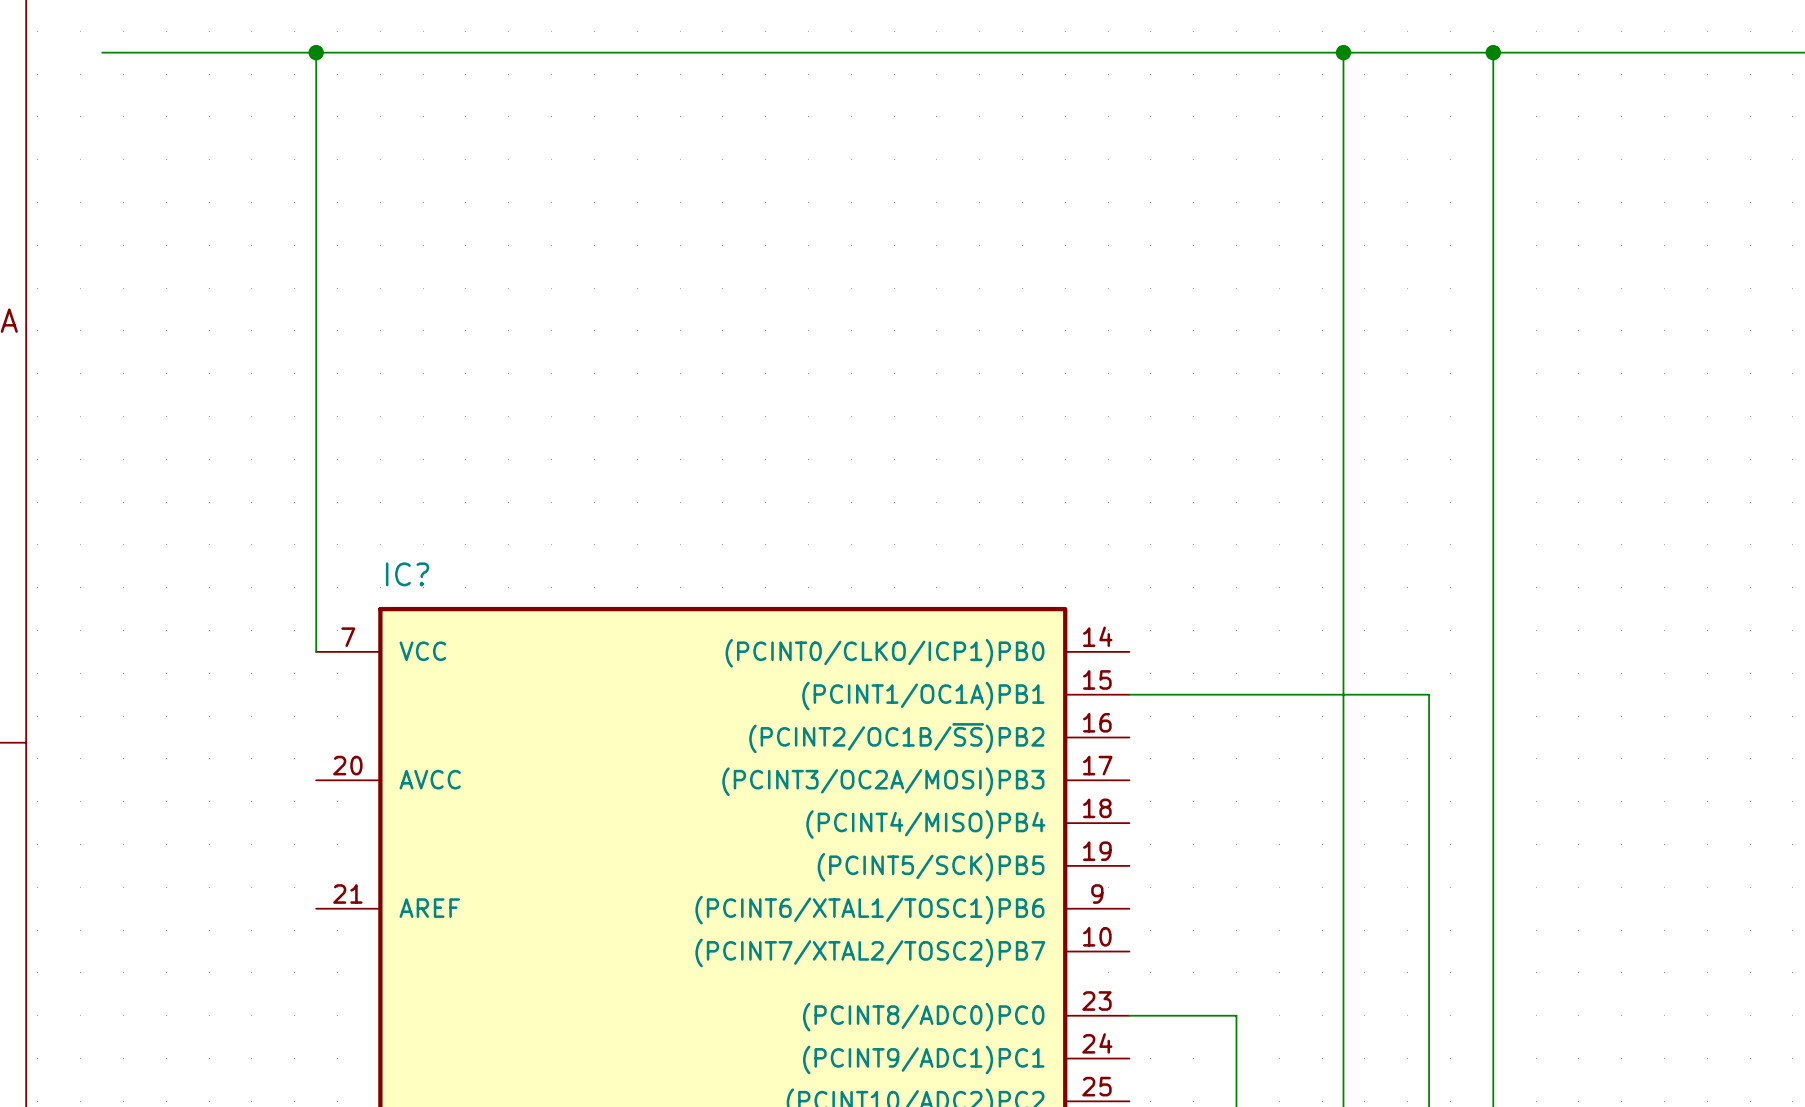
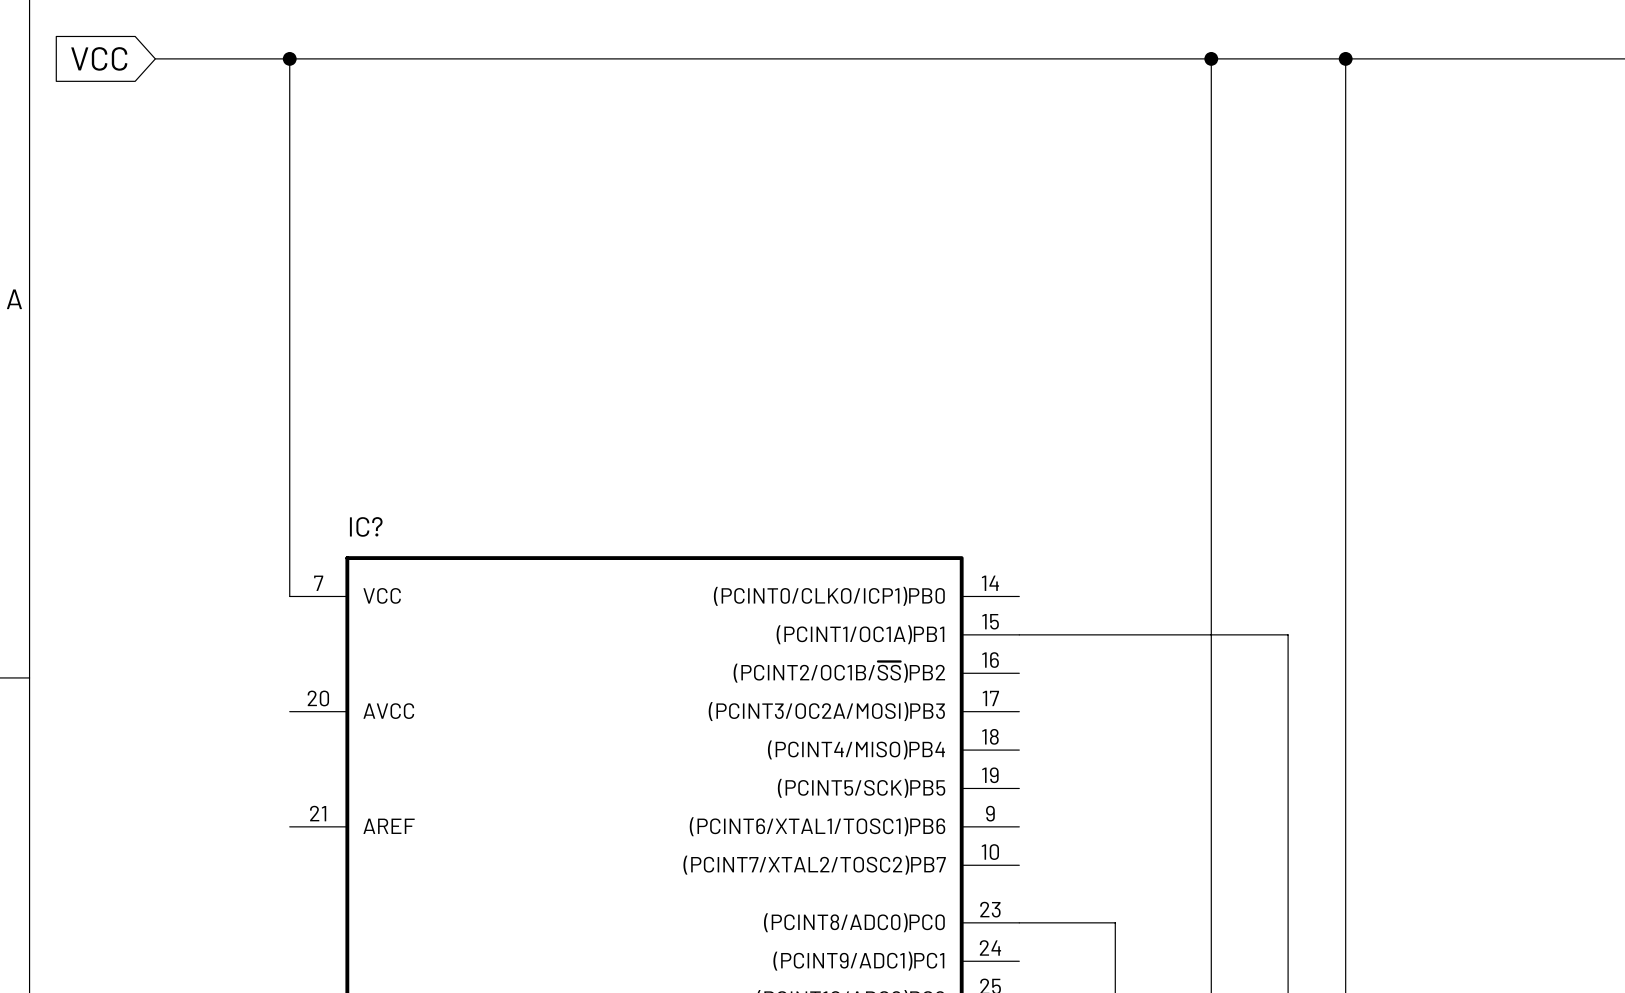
global label: none -> VCC (99, 58)
wire: (102, 52) (166, 52) -> none

